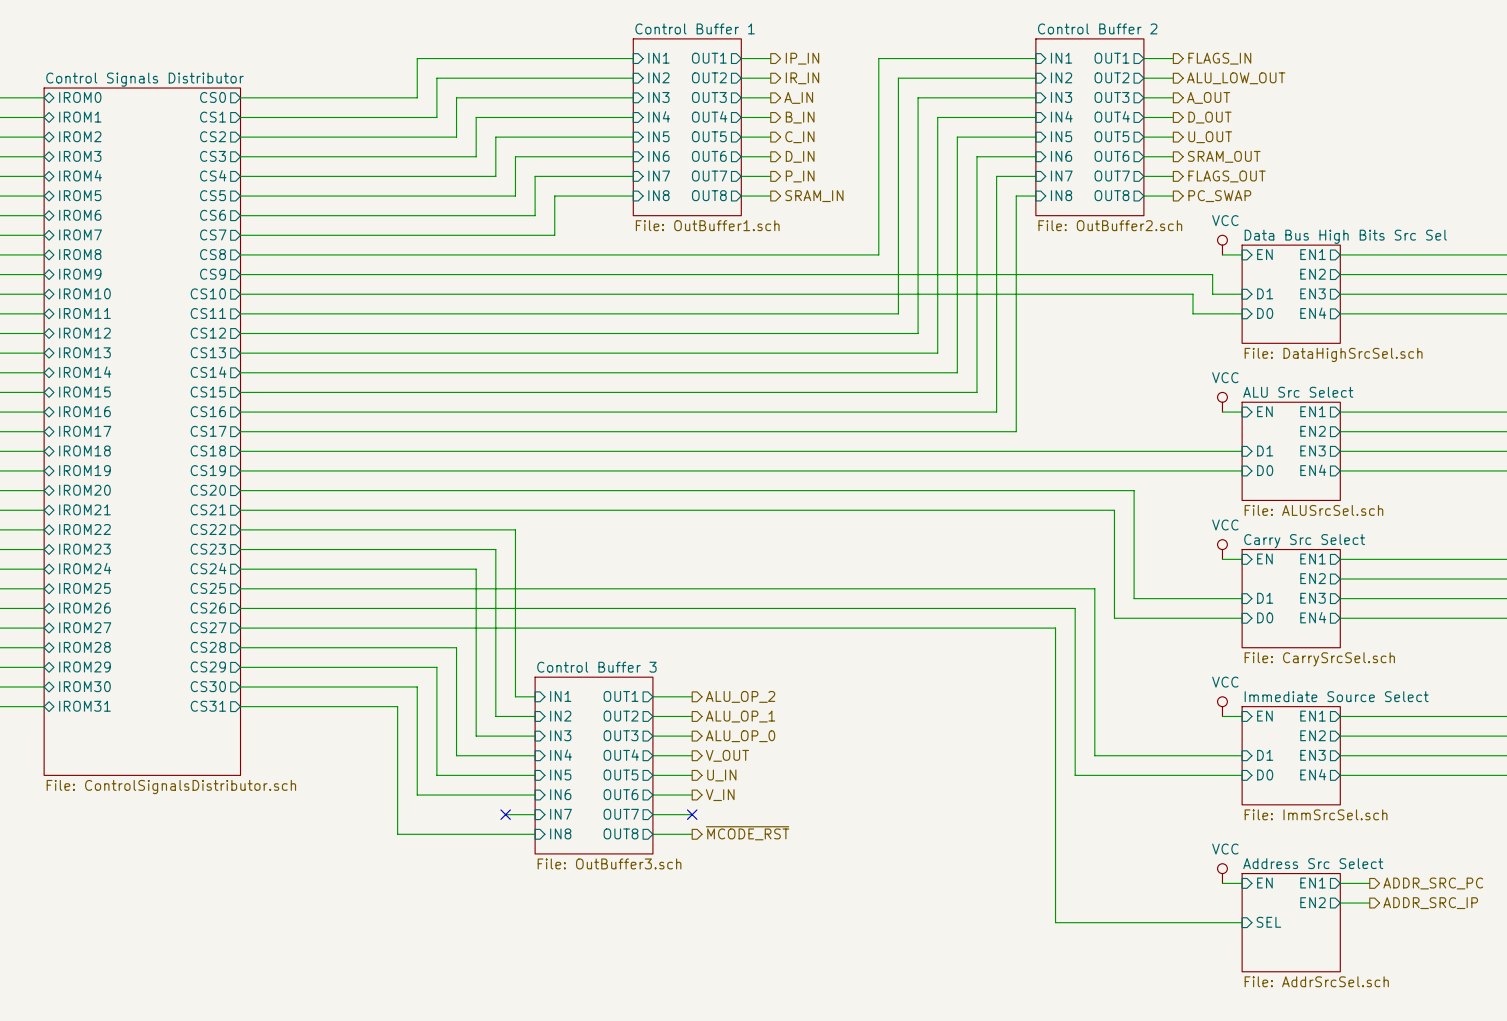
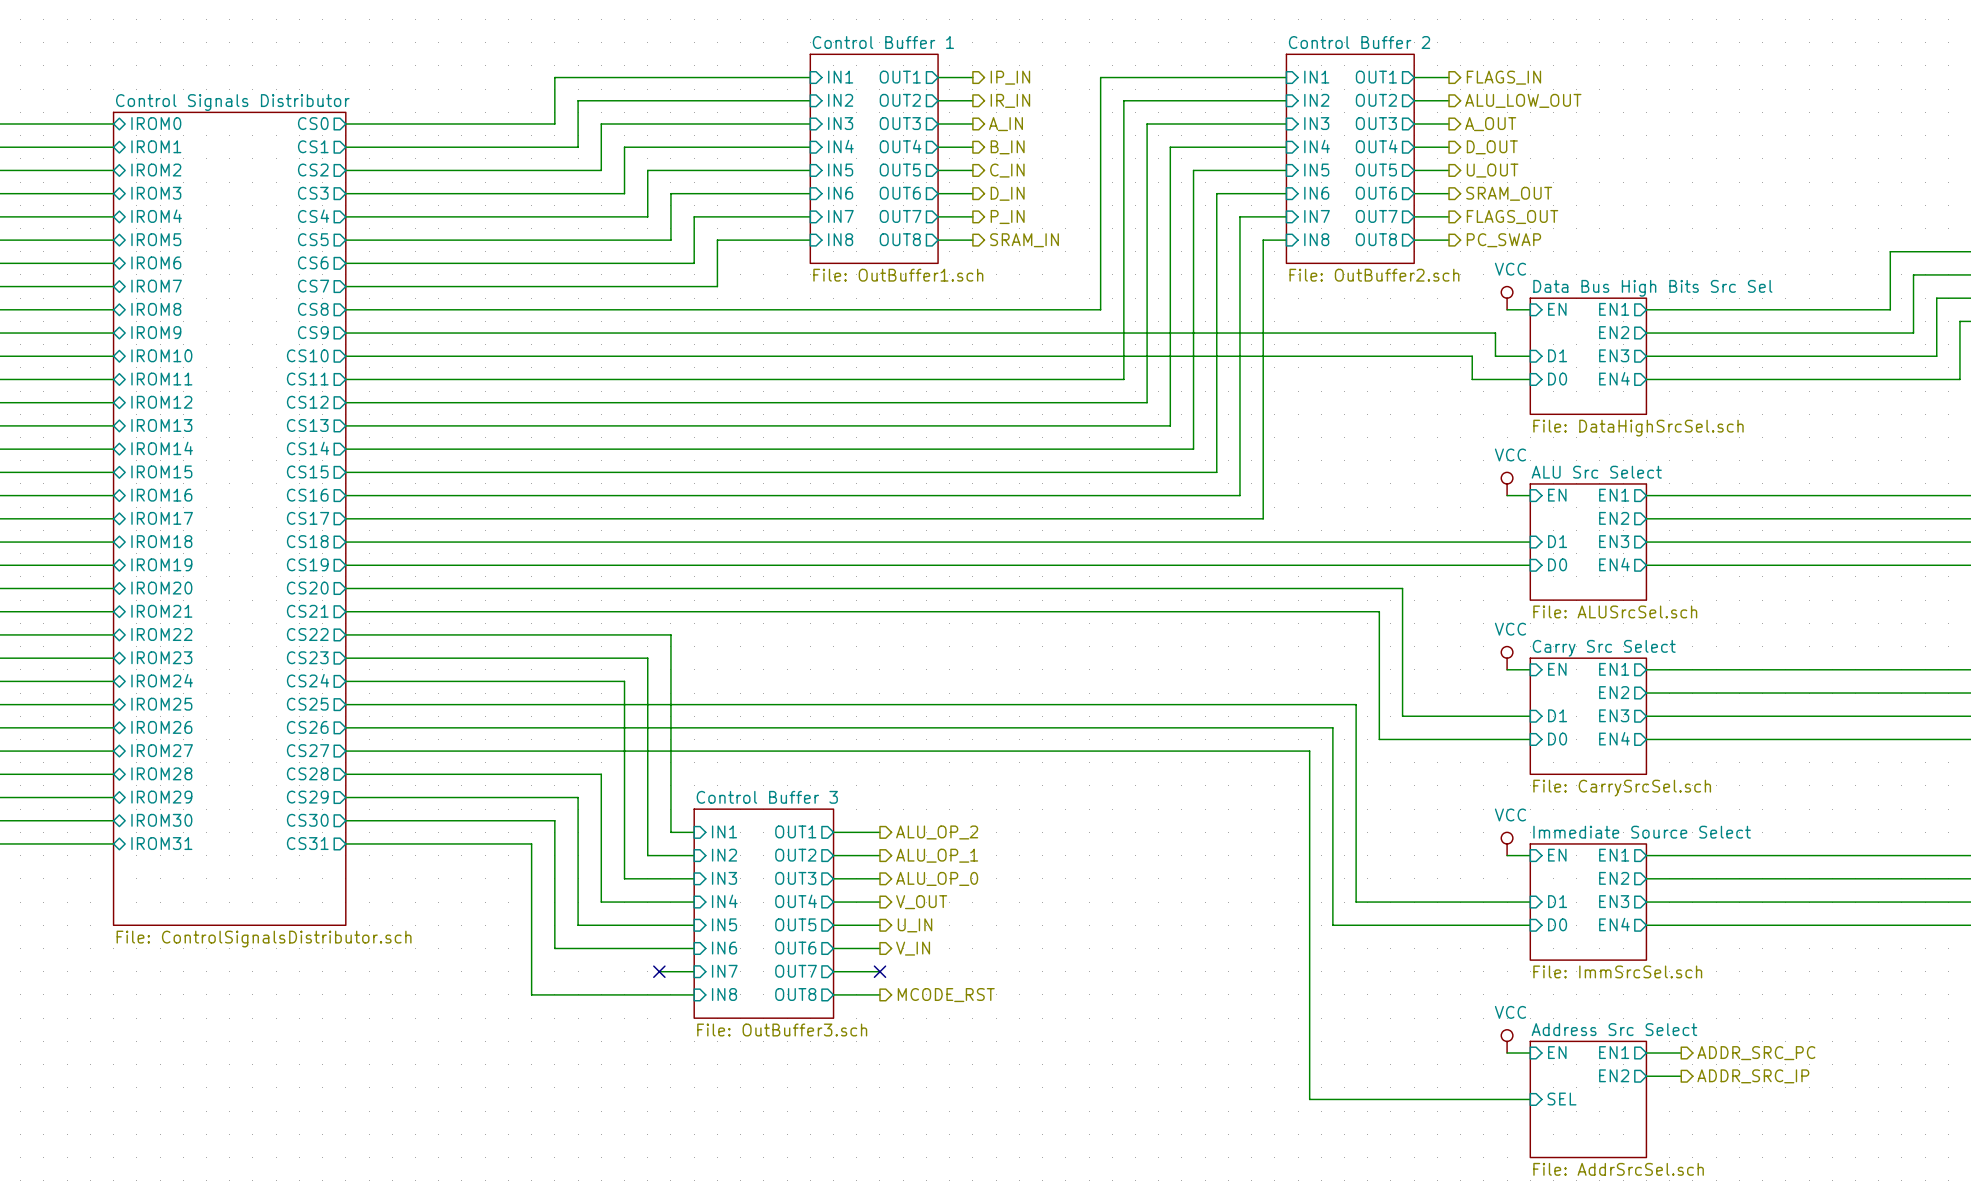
hierarchical label: ~{MCODE_RST} (747, 833) -> MCODE_RST (946, 995)

